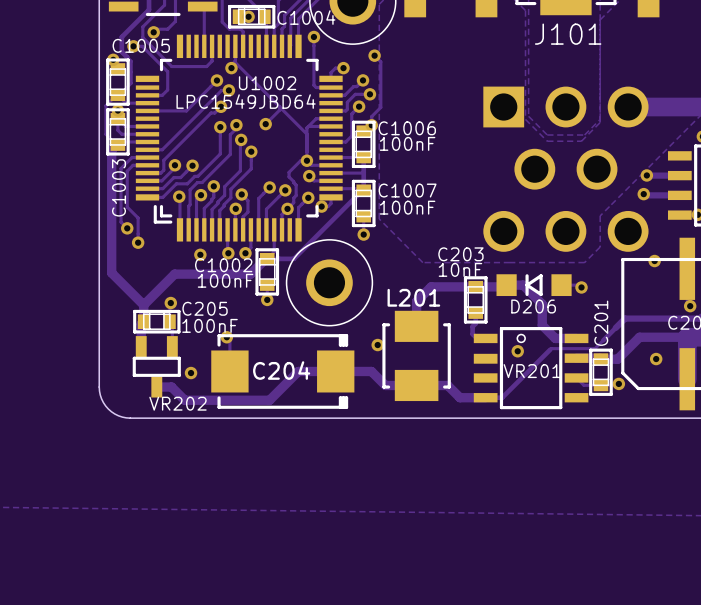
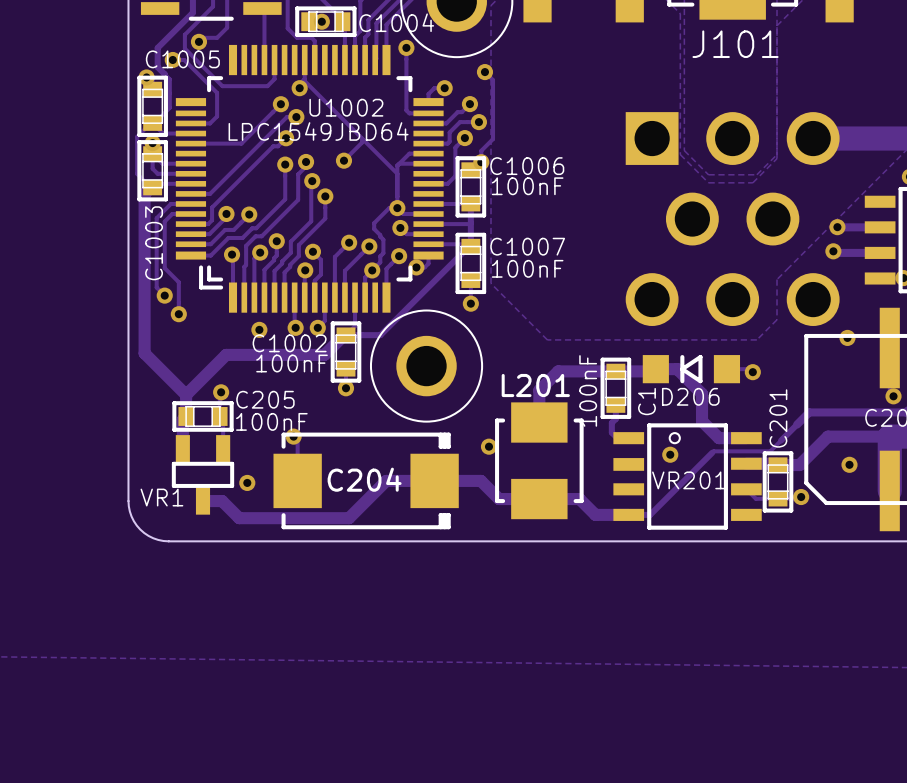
C203 name: C203 (460, 254) -> C1 (646, 401)
C203 value: 10nF (460, 269) -> 100nF (588, 390)
VR202 name: VR202 (177, 403) -> VR1 (161, 497)

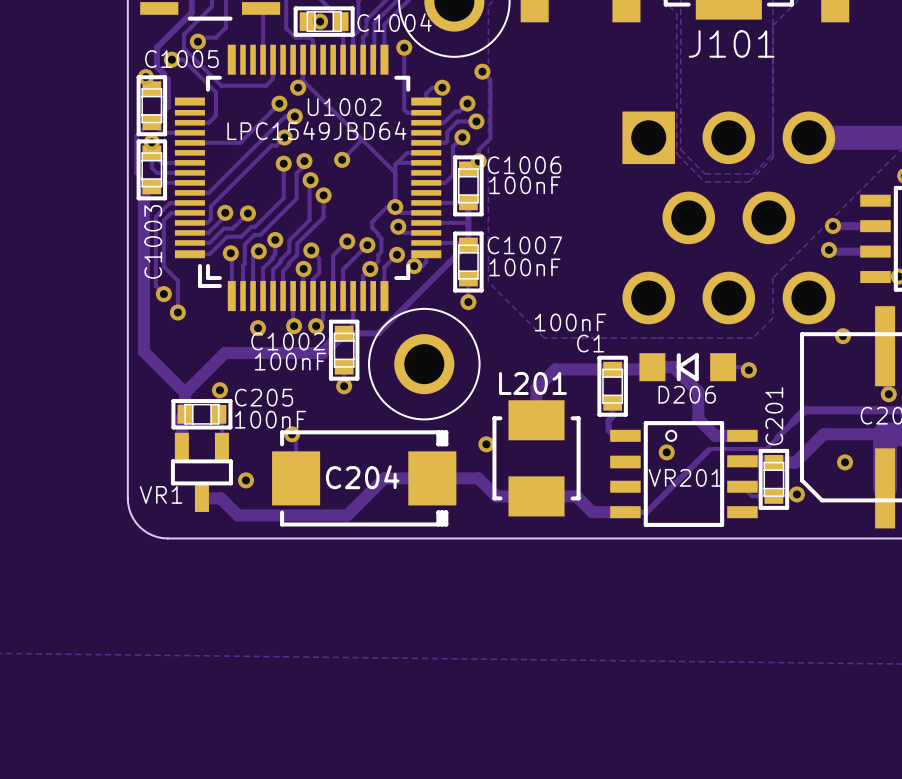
C1 value rotation: 0° (588, 390) -> 90° clockwise (570, 322)
C1 name rotation: 0° (646, 401) -> 90° clockwise (590, 343)
C1 name position: C1 (646, 401) -> C1 (590, 343)

